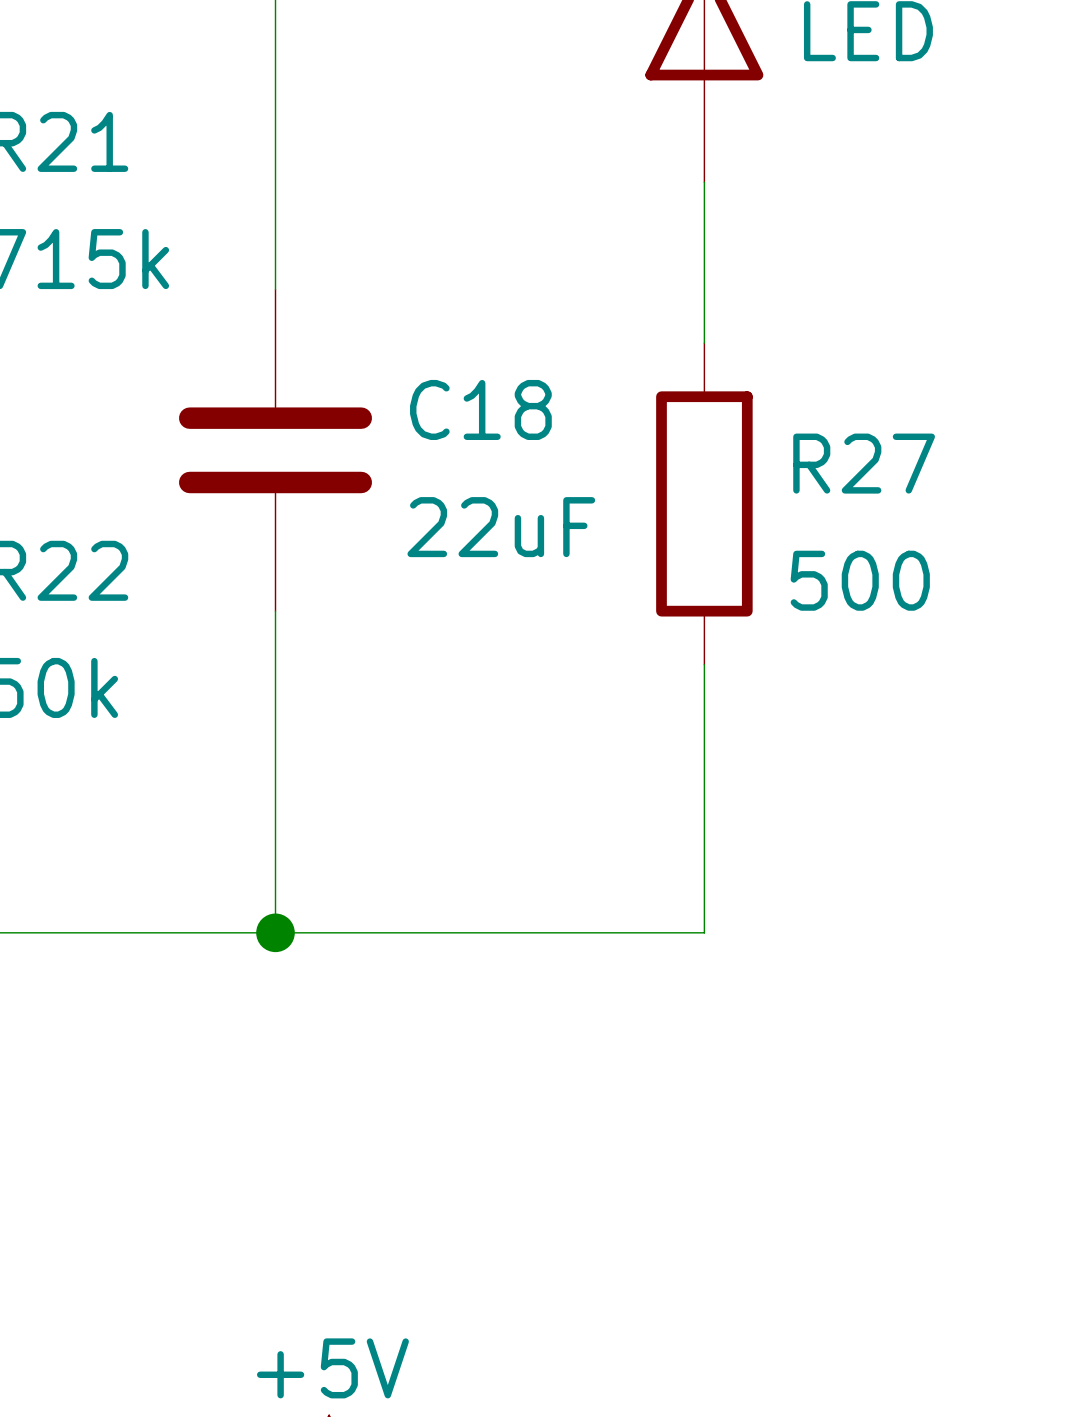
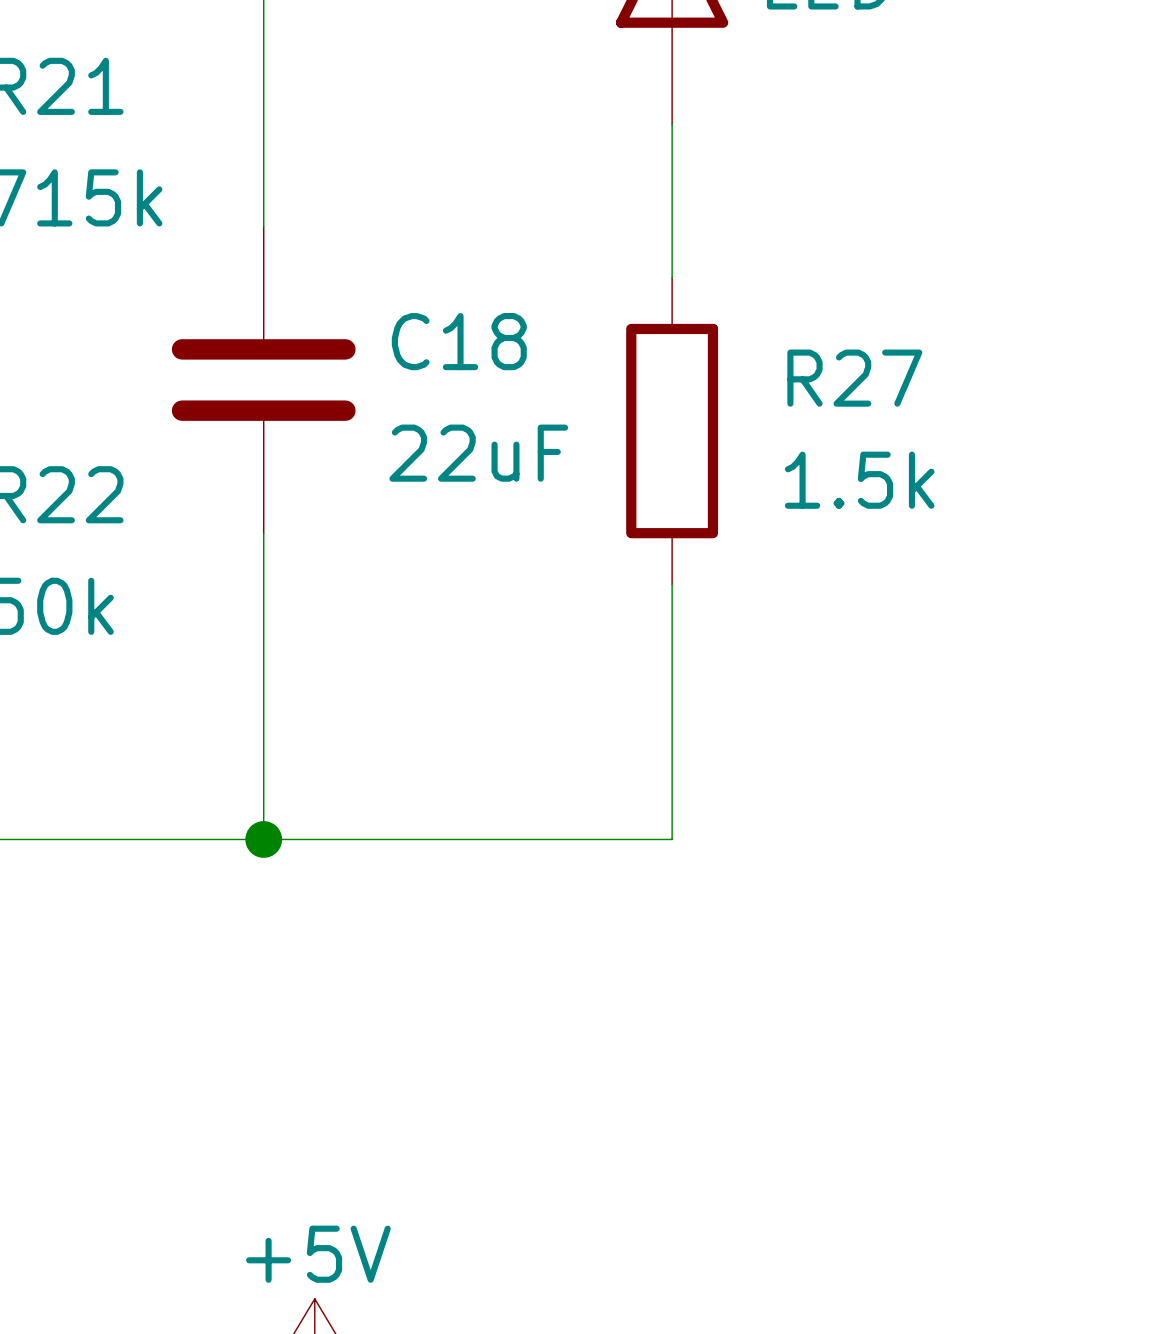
R27 name position: R27 (864, 463) -> R27 (854, 378)
R27 value: 500 (860, 580) -> 1.5k (859, 480)

